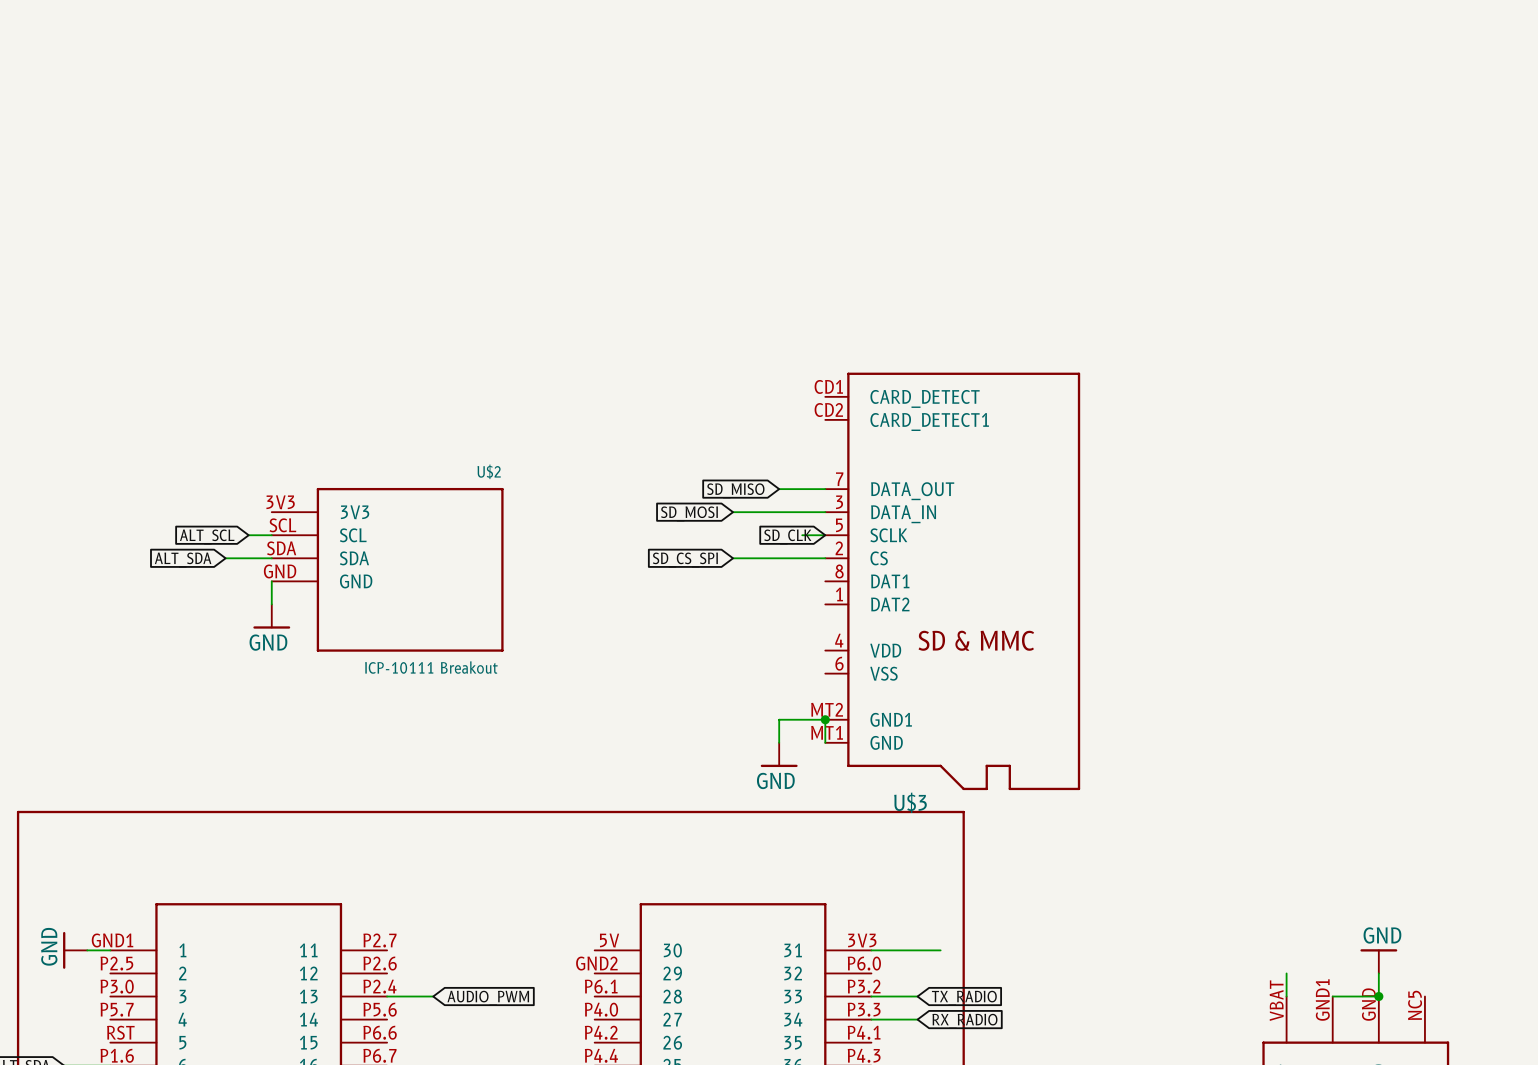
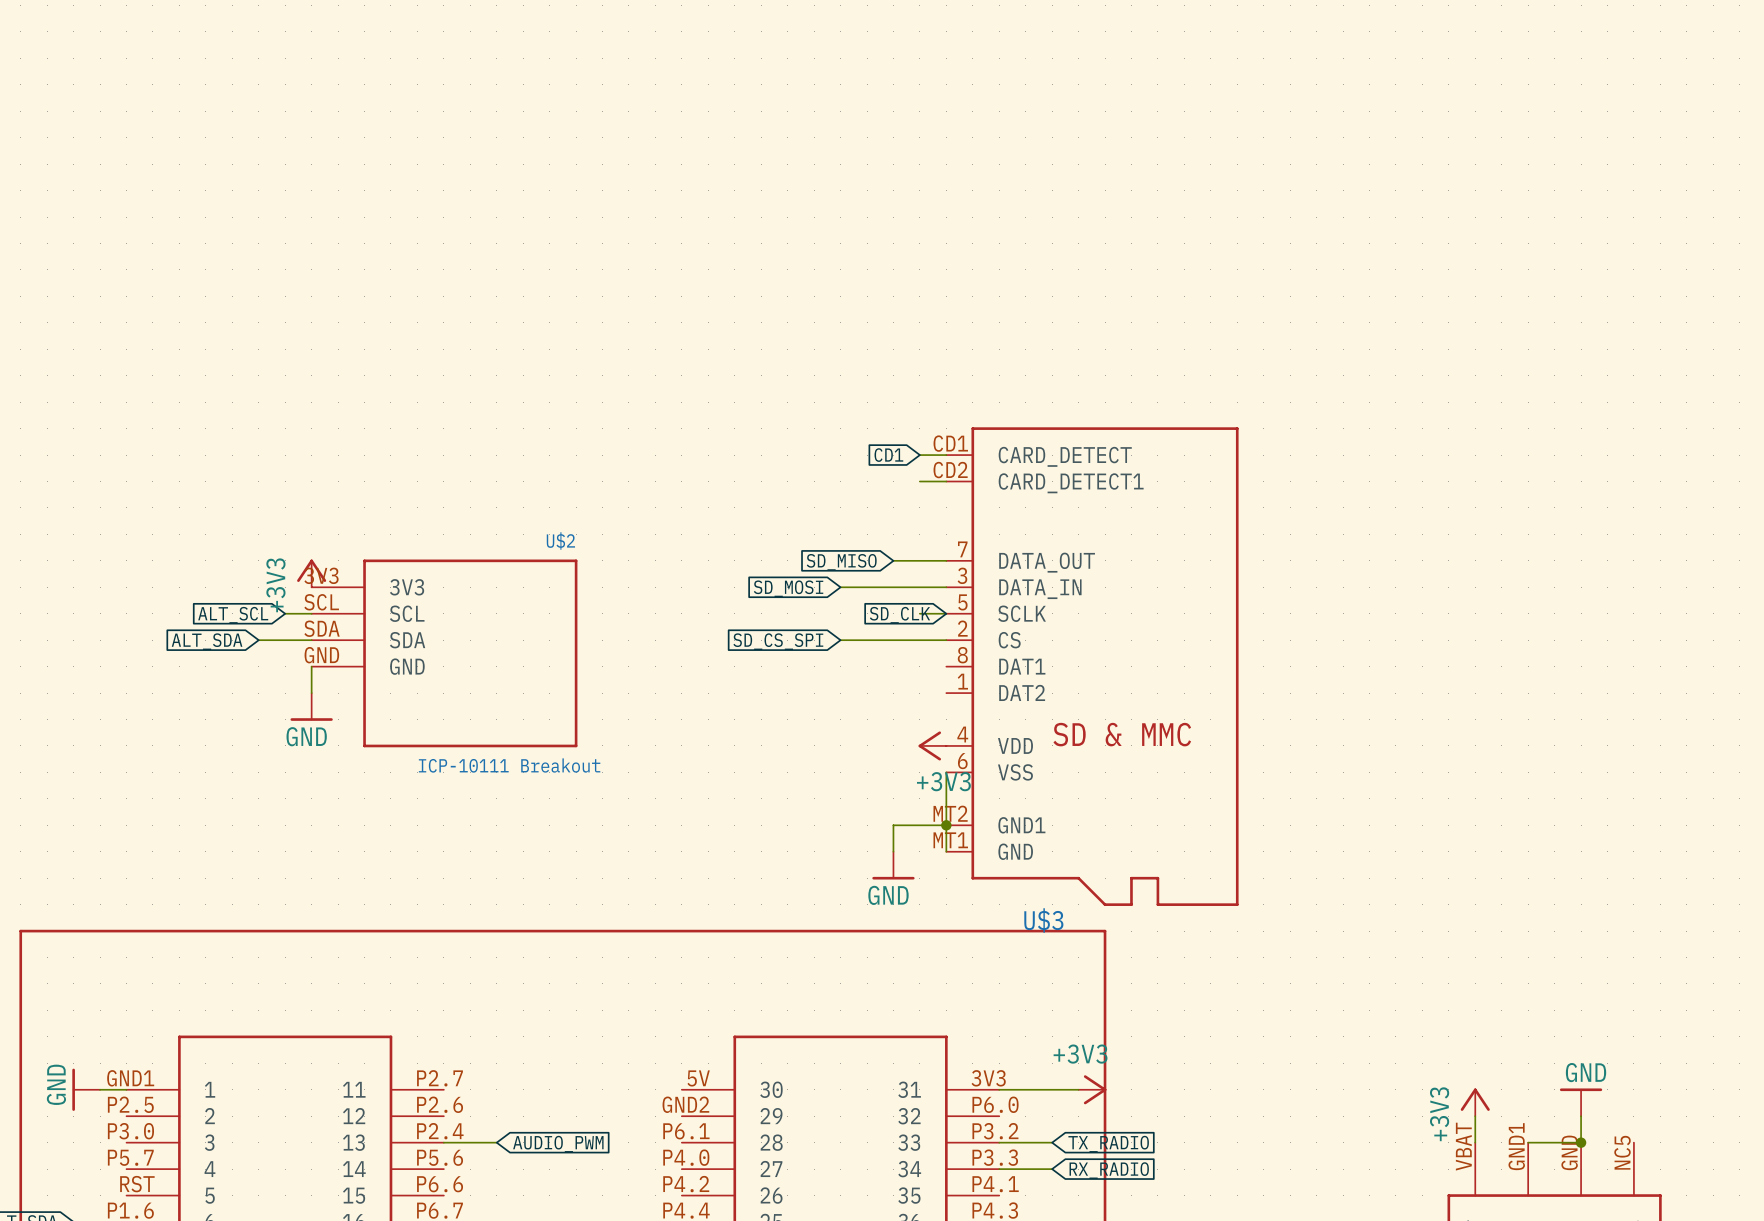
global label: none -> CD1 (888, 455)
wire: none -> (919, 455) (946, 455)
wire: none -> (919, 481) (946, 481)
power symbol: none -> +3V3 (311, 573)
power symbol: none -> +3V3 (932, 745)
wire: none -> (946, 772) (946, 825)
power symbol: none -> +3V3 (1092, 1089)
power symbol: none -> +3V3 (1475, 1102)

